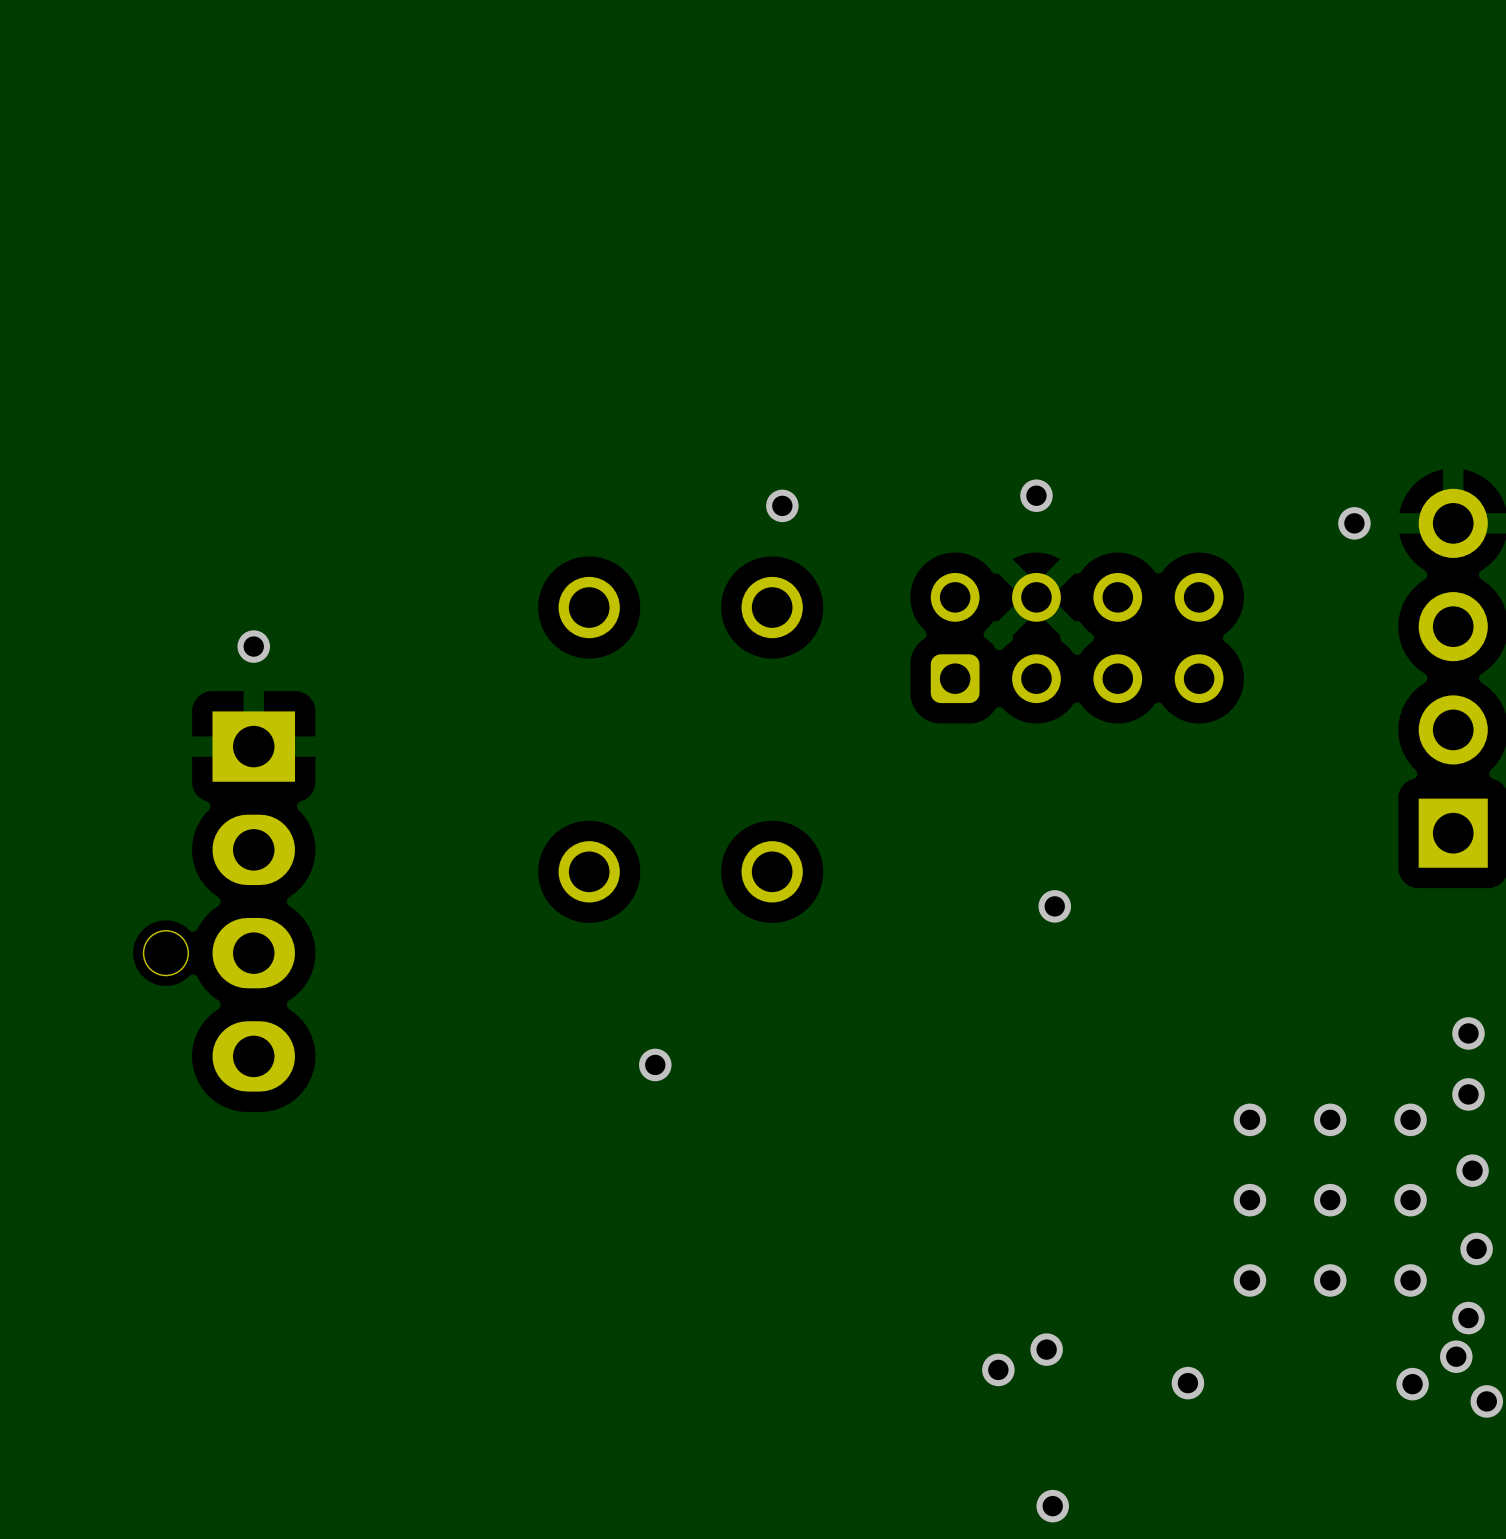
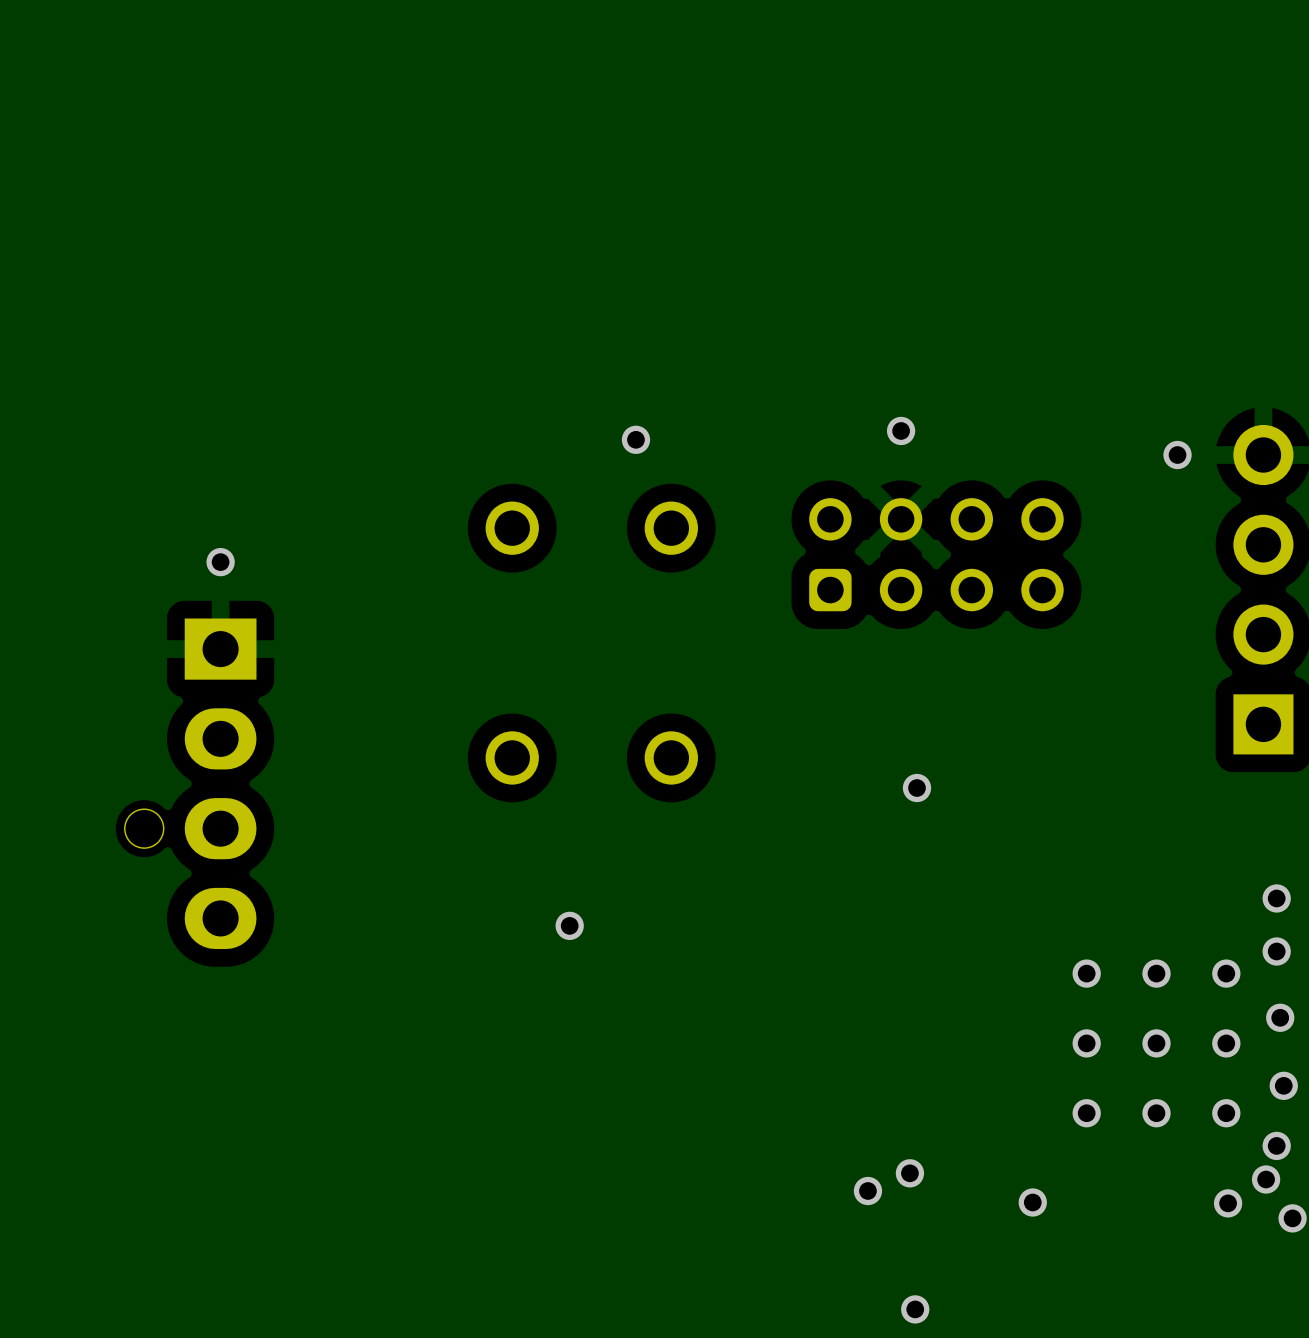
via position: (782, 505) -> (635, 439)

